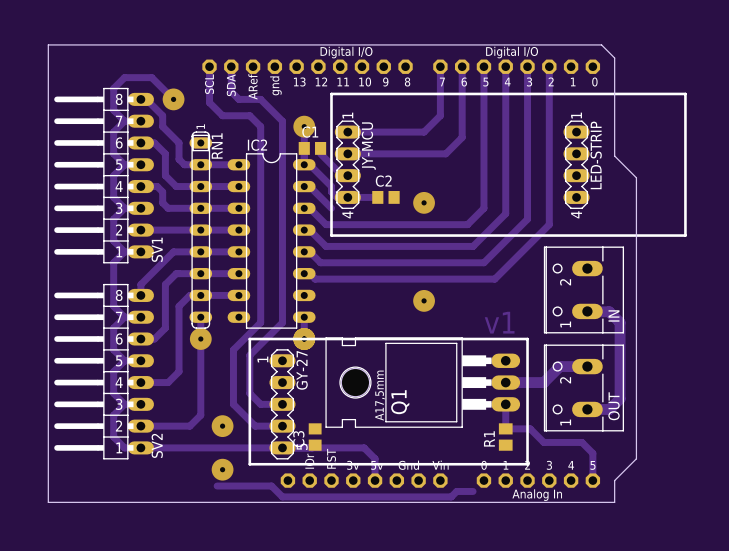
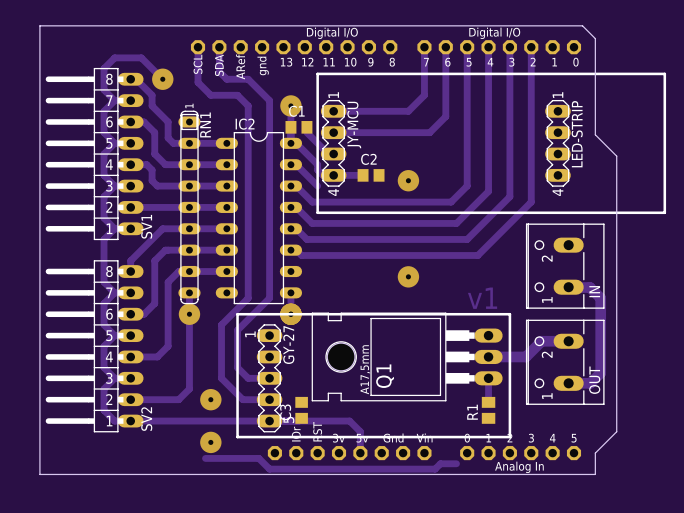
track: (505, 428) (530, 428) (543, 442) (581, 442) (592, 453) (592, 480) -> none

